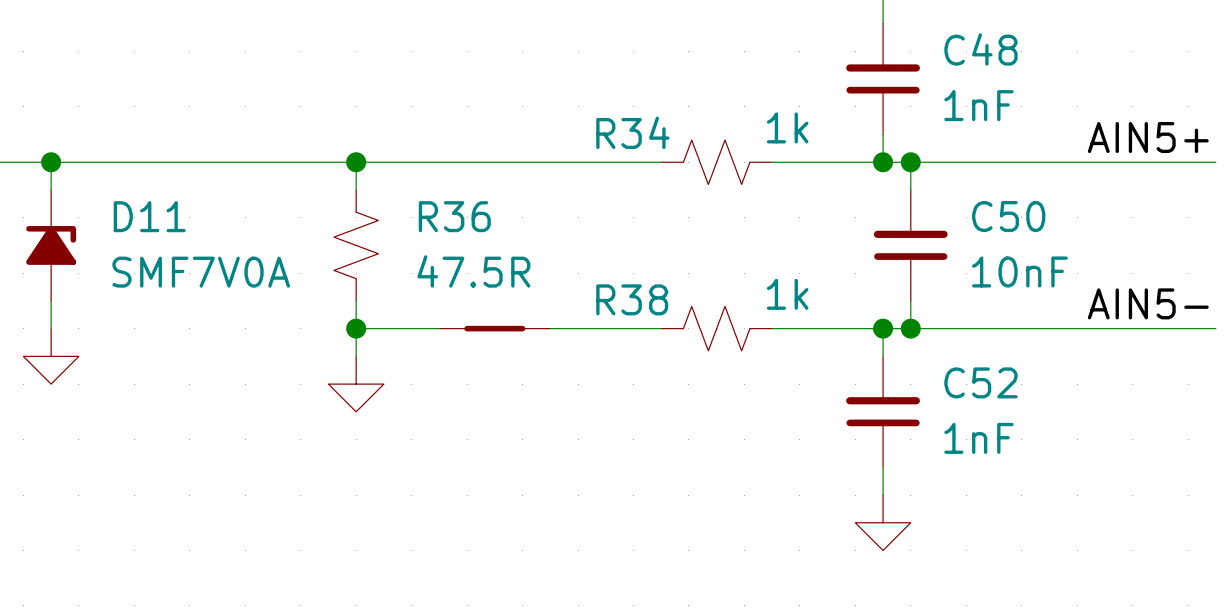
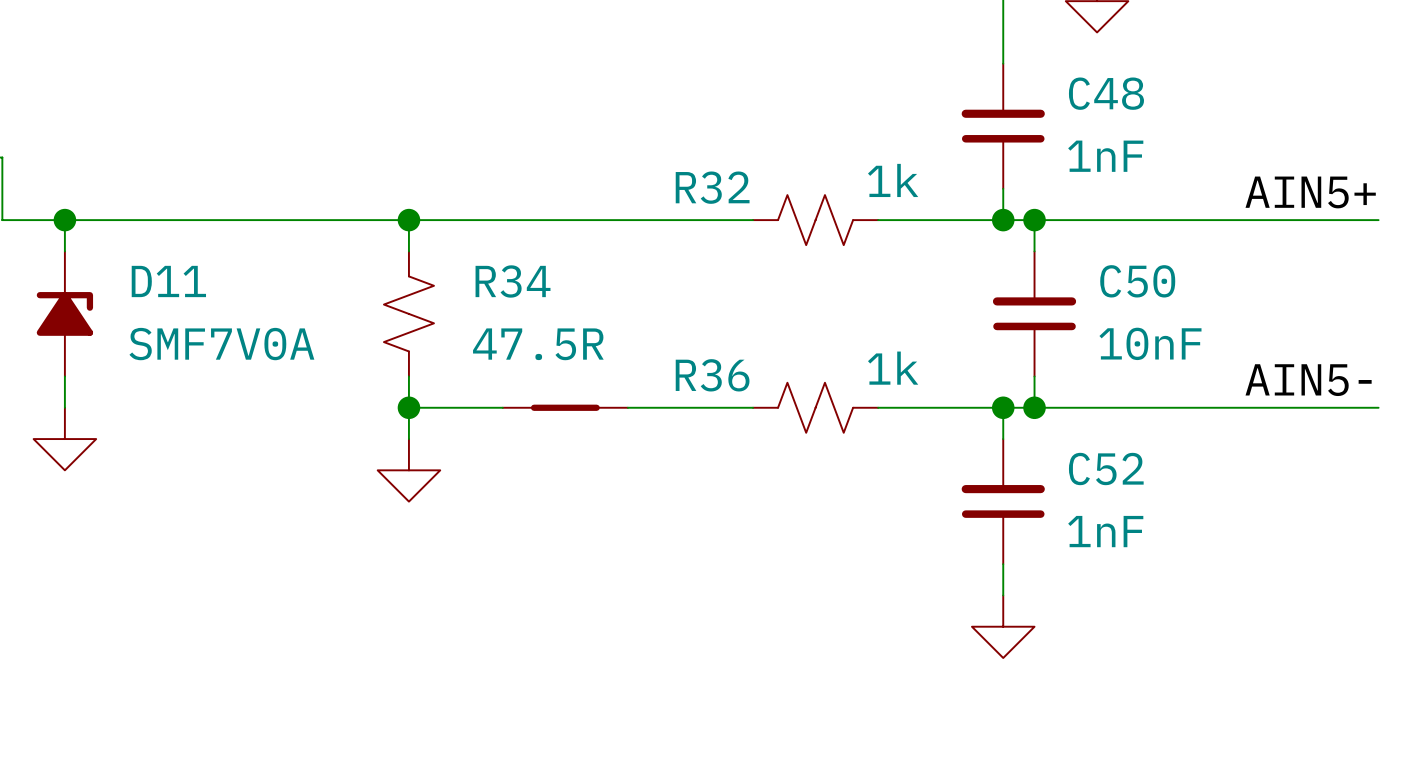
R34 name: R34 (632, 132) -> R32 (712, 187)
R36 name: R36 (454, 216) -> R34 (513, 281)
R38 name: R38 (632, 299) -> R36 (712, 375)

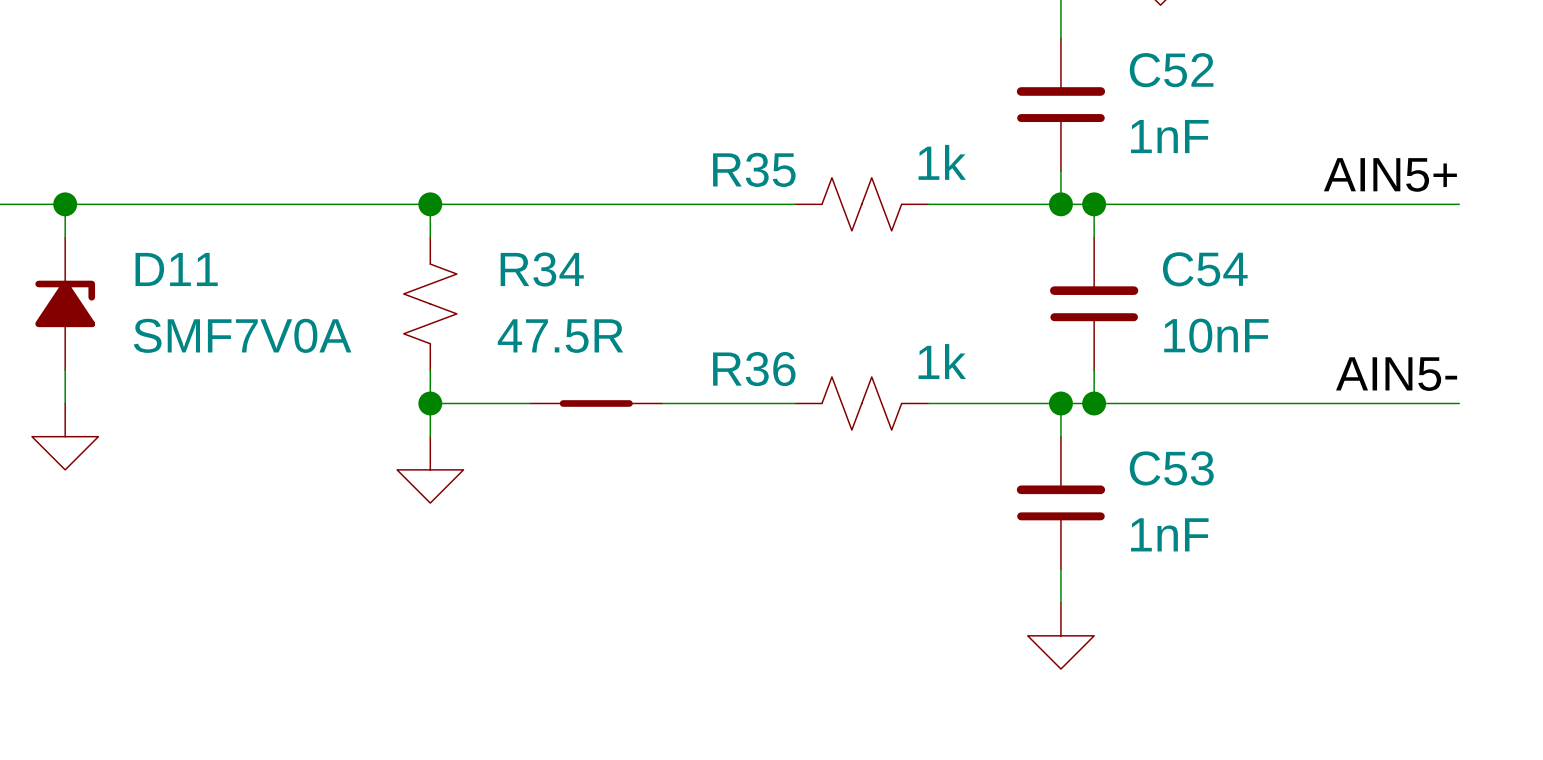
C48 name: C48 (1106, 93) -> C52 (1171, 70)
R32 name: R32 (712, 187) -> R35 (754, 169)
C50 name: C50 (1137, 281) -> C54 (1205, 269)
C52 name: C52 (1106, 469) -> C53 (1171, 468)

